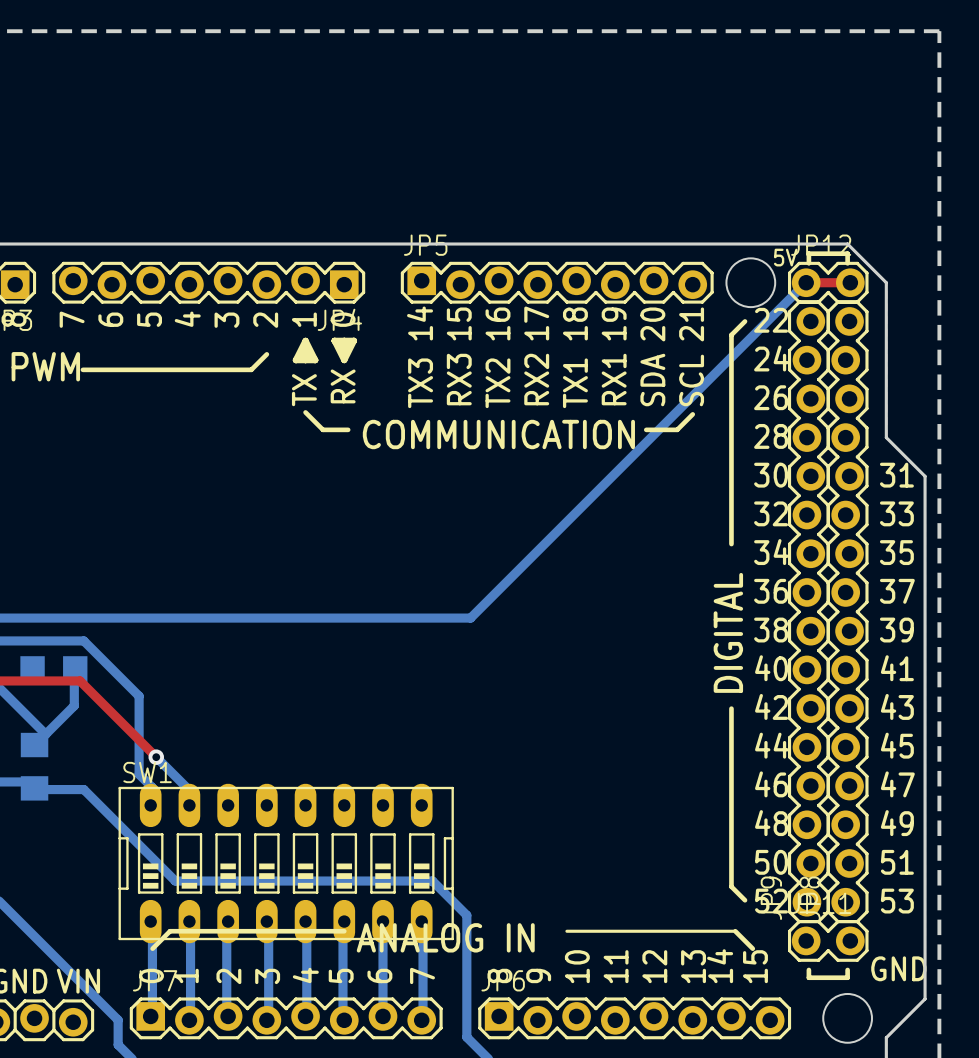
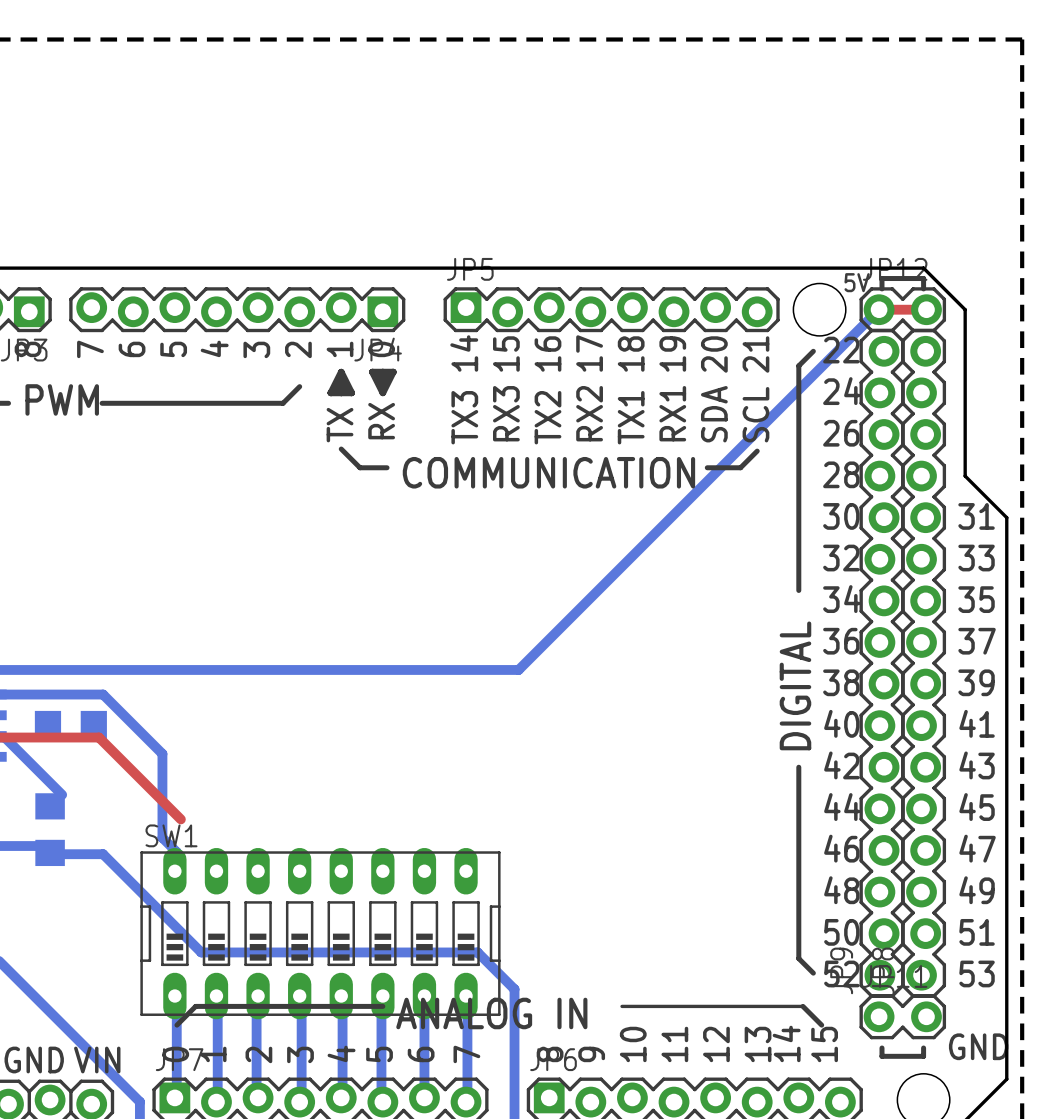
bottom track: (75, 669) (74, 705) (34, 745) -> none
bottom track: (156, 757) (188, 789) (189, 805) -> none
via: (156, 757) -> none

